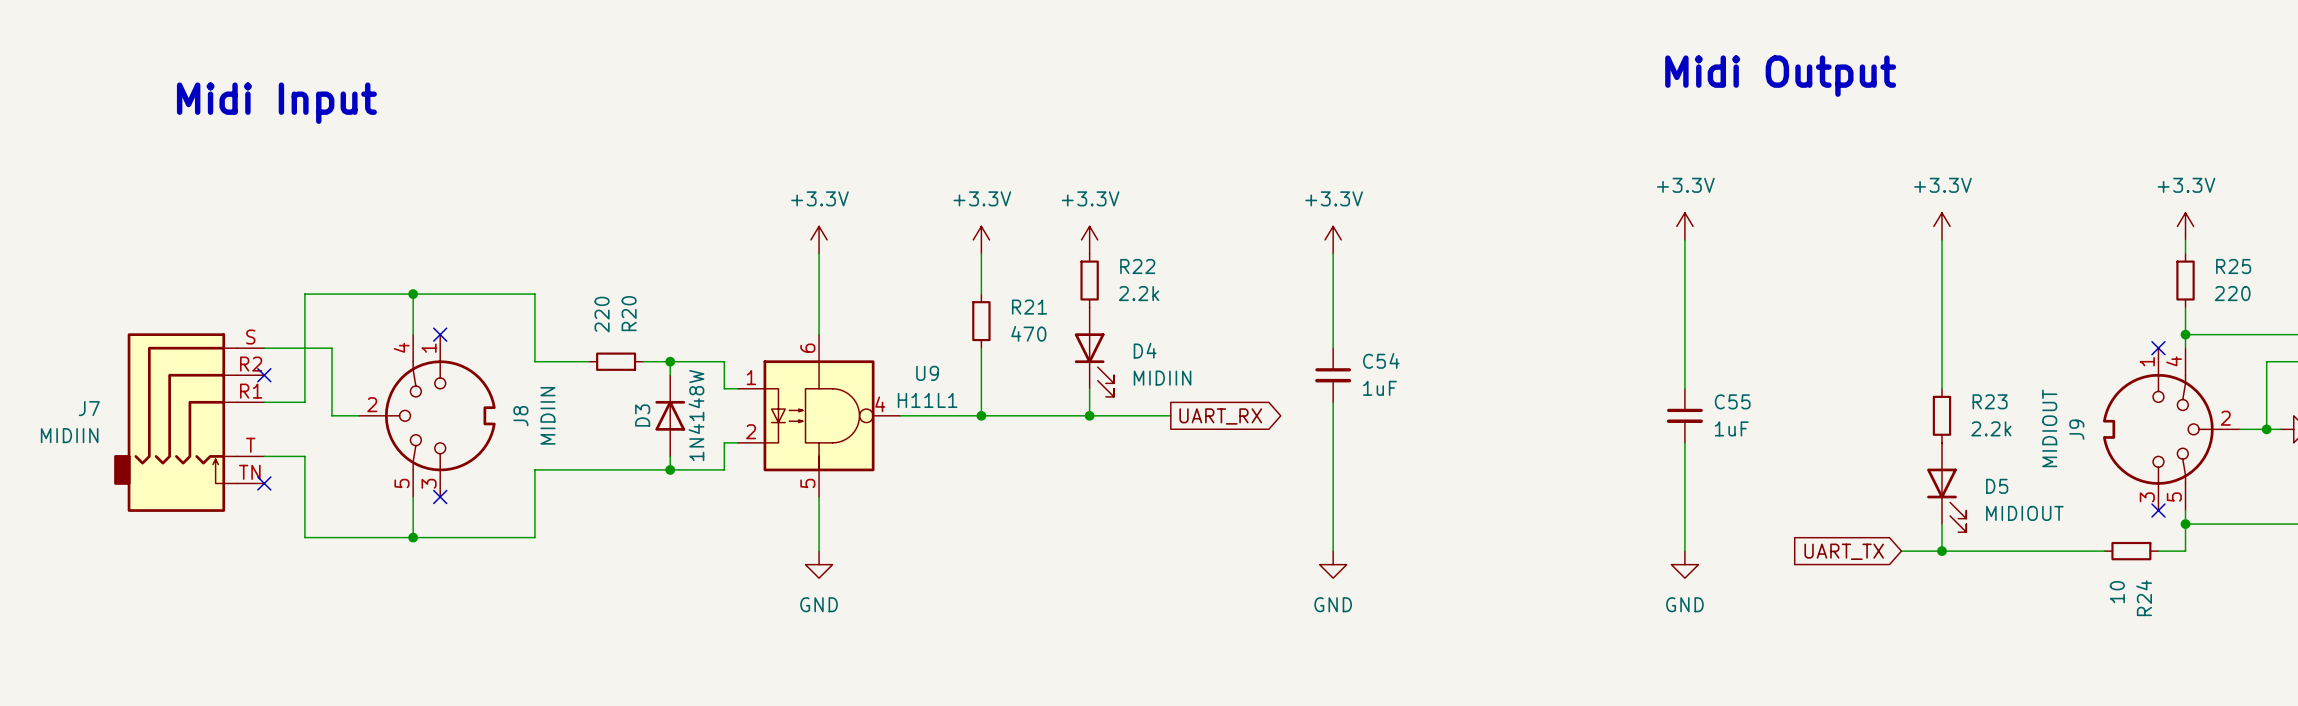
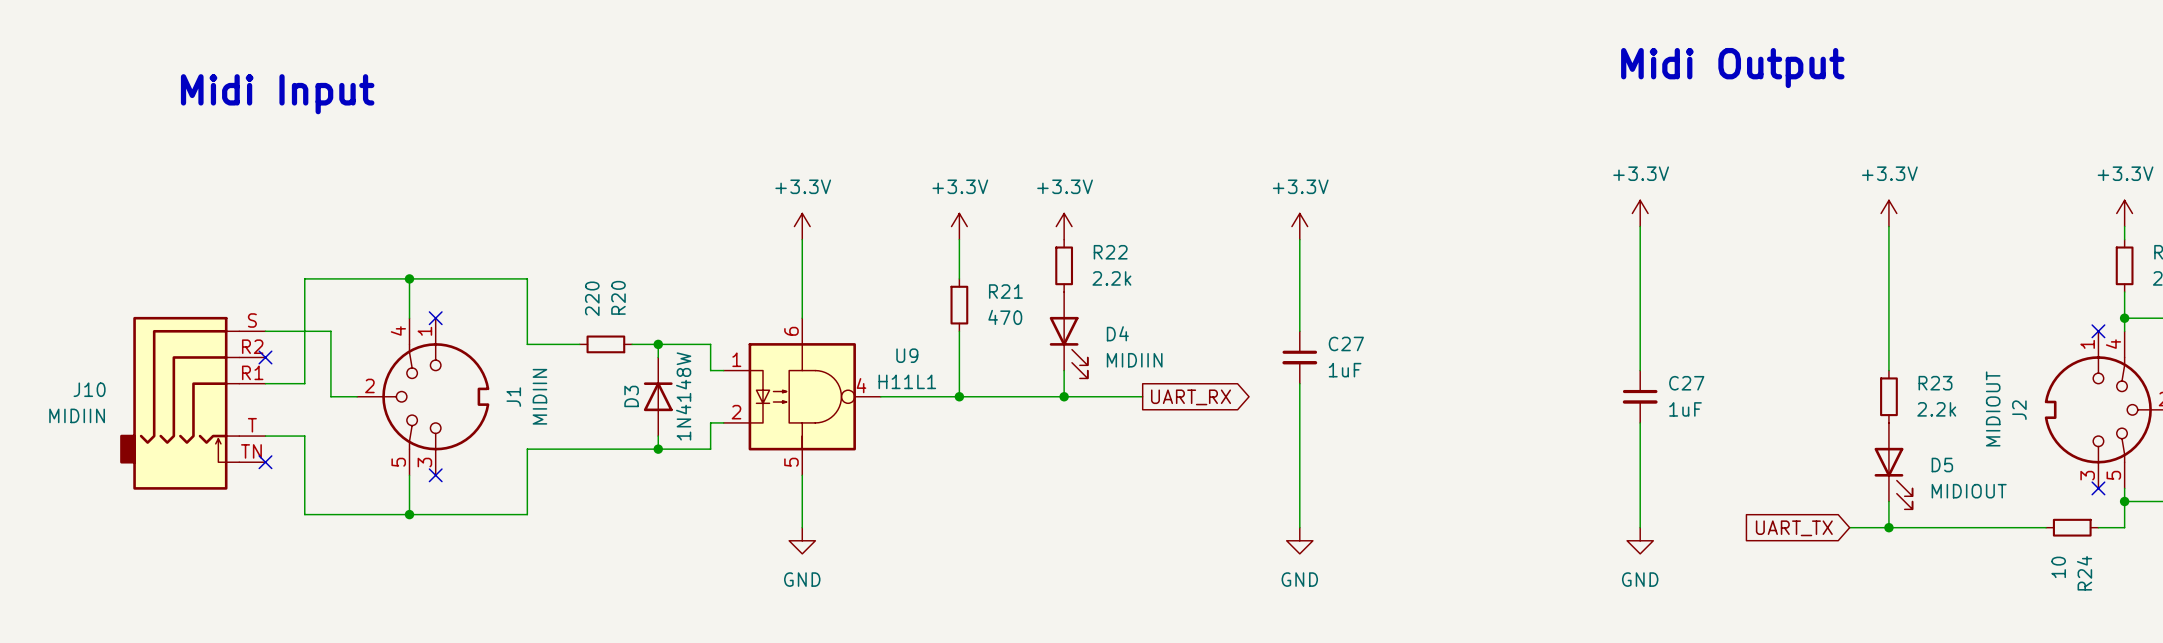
C54 name: C54 (1381, 360) -> C27 (1346, 343)
C55 name: C55 (1732, 401) -> C27 (1686, 383)
J7 name: J7 (89, 408) -> J10 (89, 389)
J8 name: J8 (520, 416) -> J1 (513, 397)
J9 name: J9 (2076, 429) -> J2 (2019, 410)

